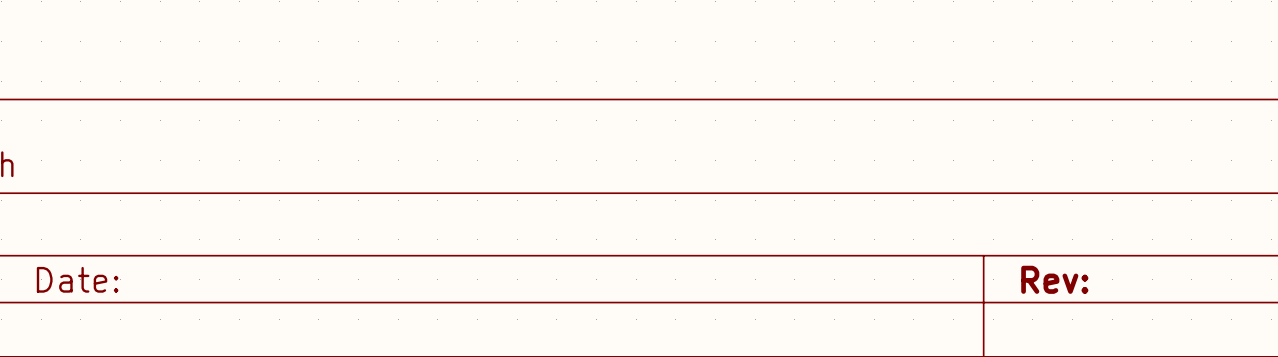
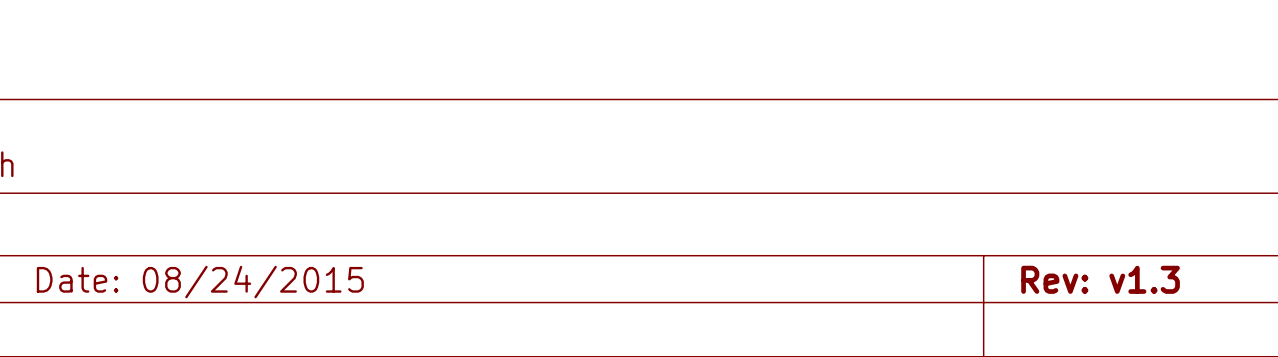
title block: Date: (77, 279) -> Date: 08/24/2015 (200, 282)
title block: Rev: (1054, 279) -> Rev: v1.3 (1100, 279)

